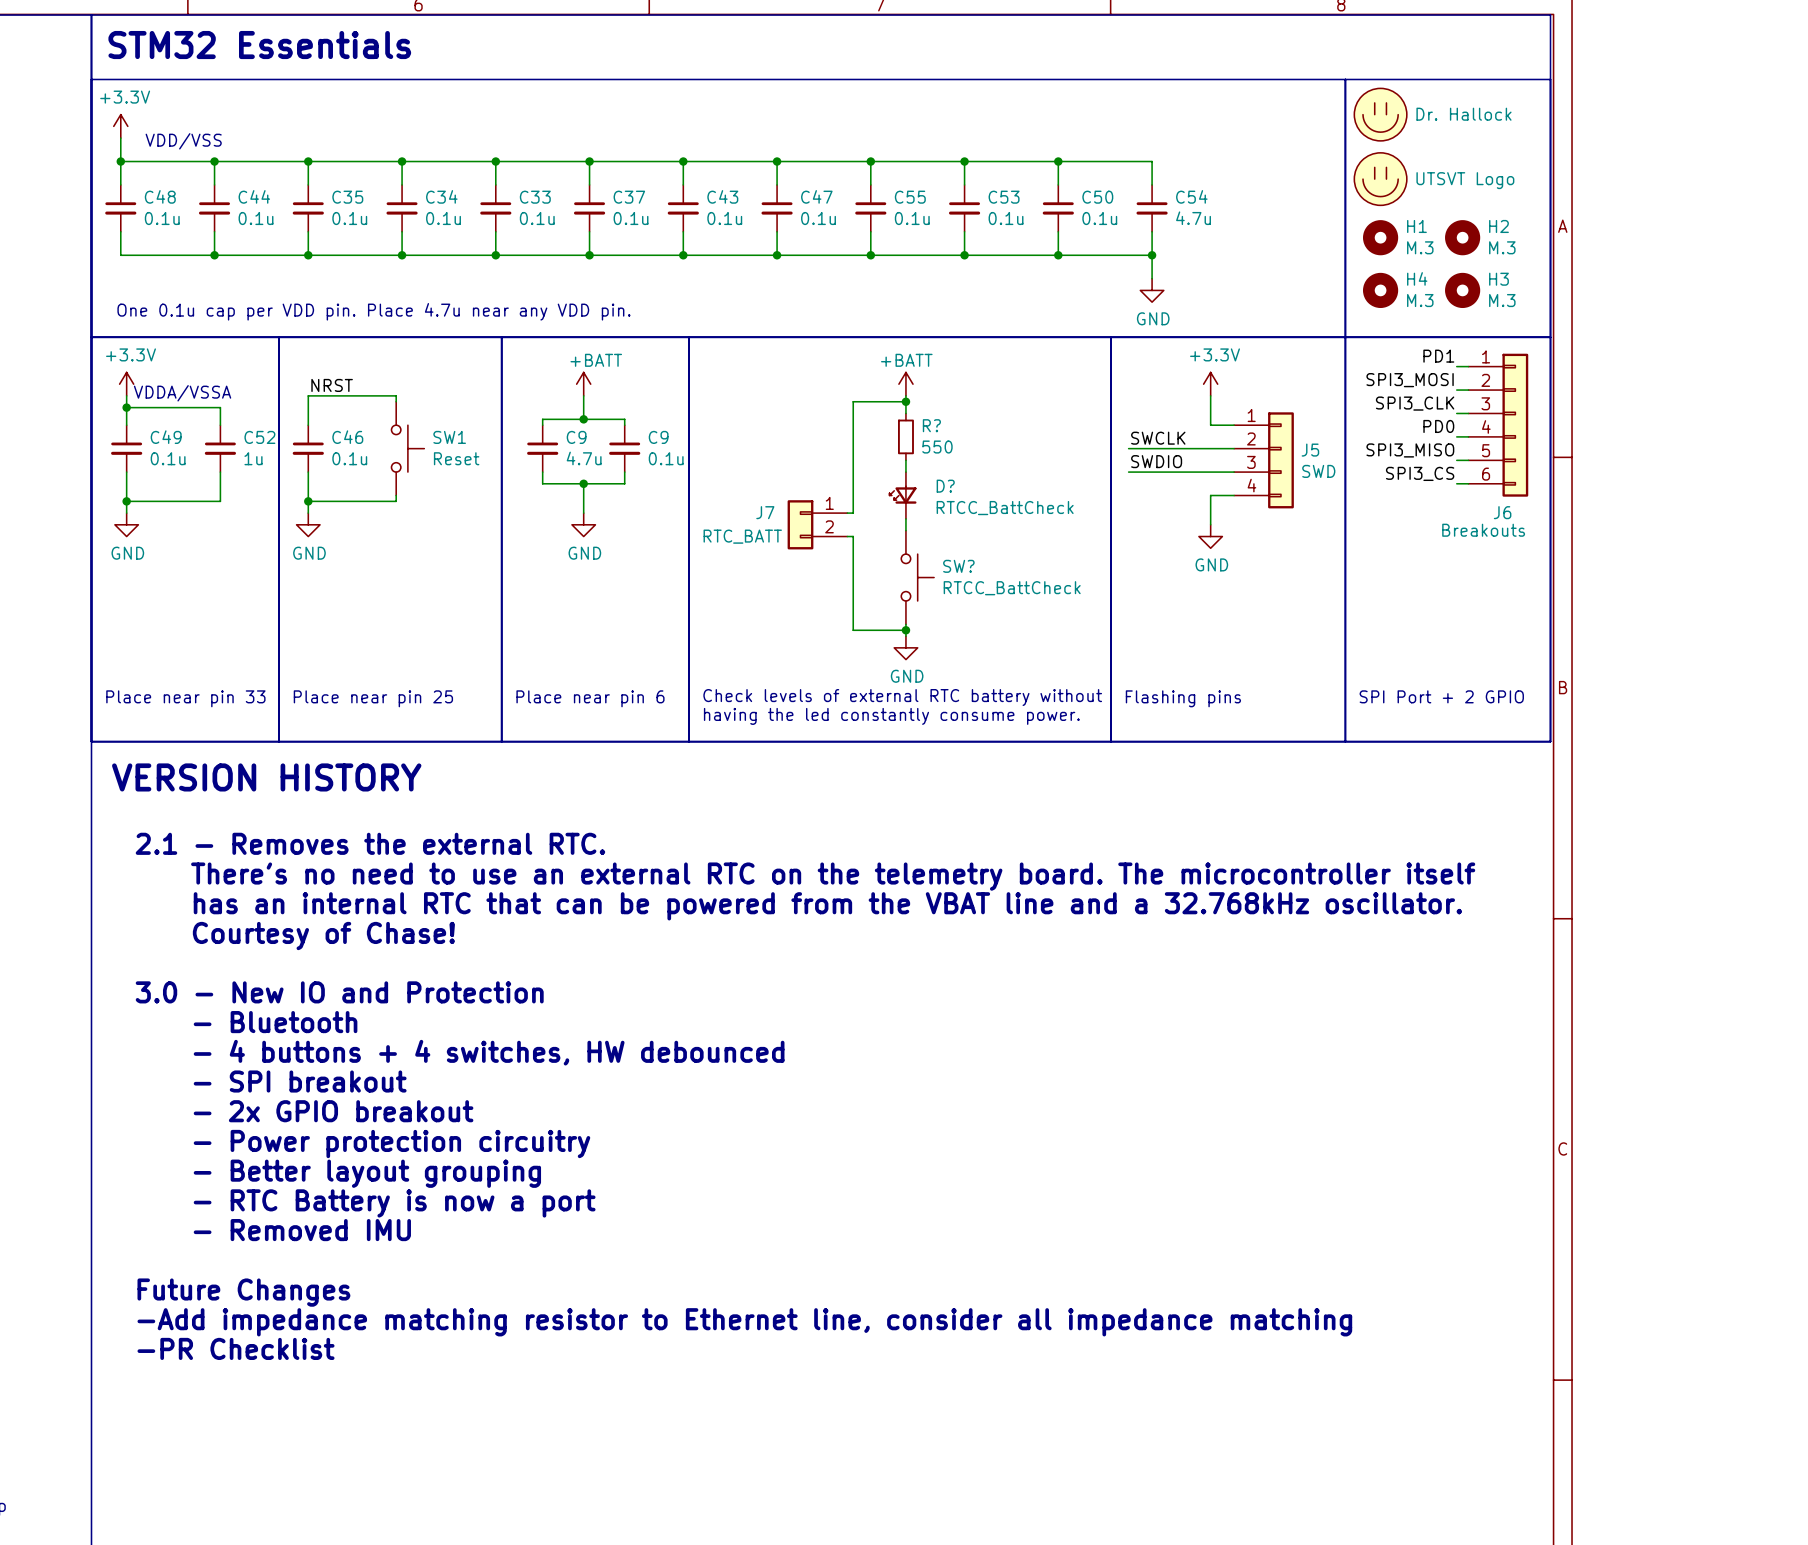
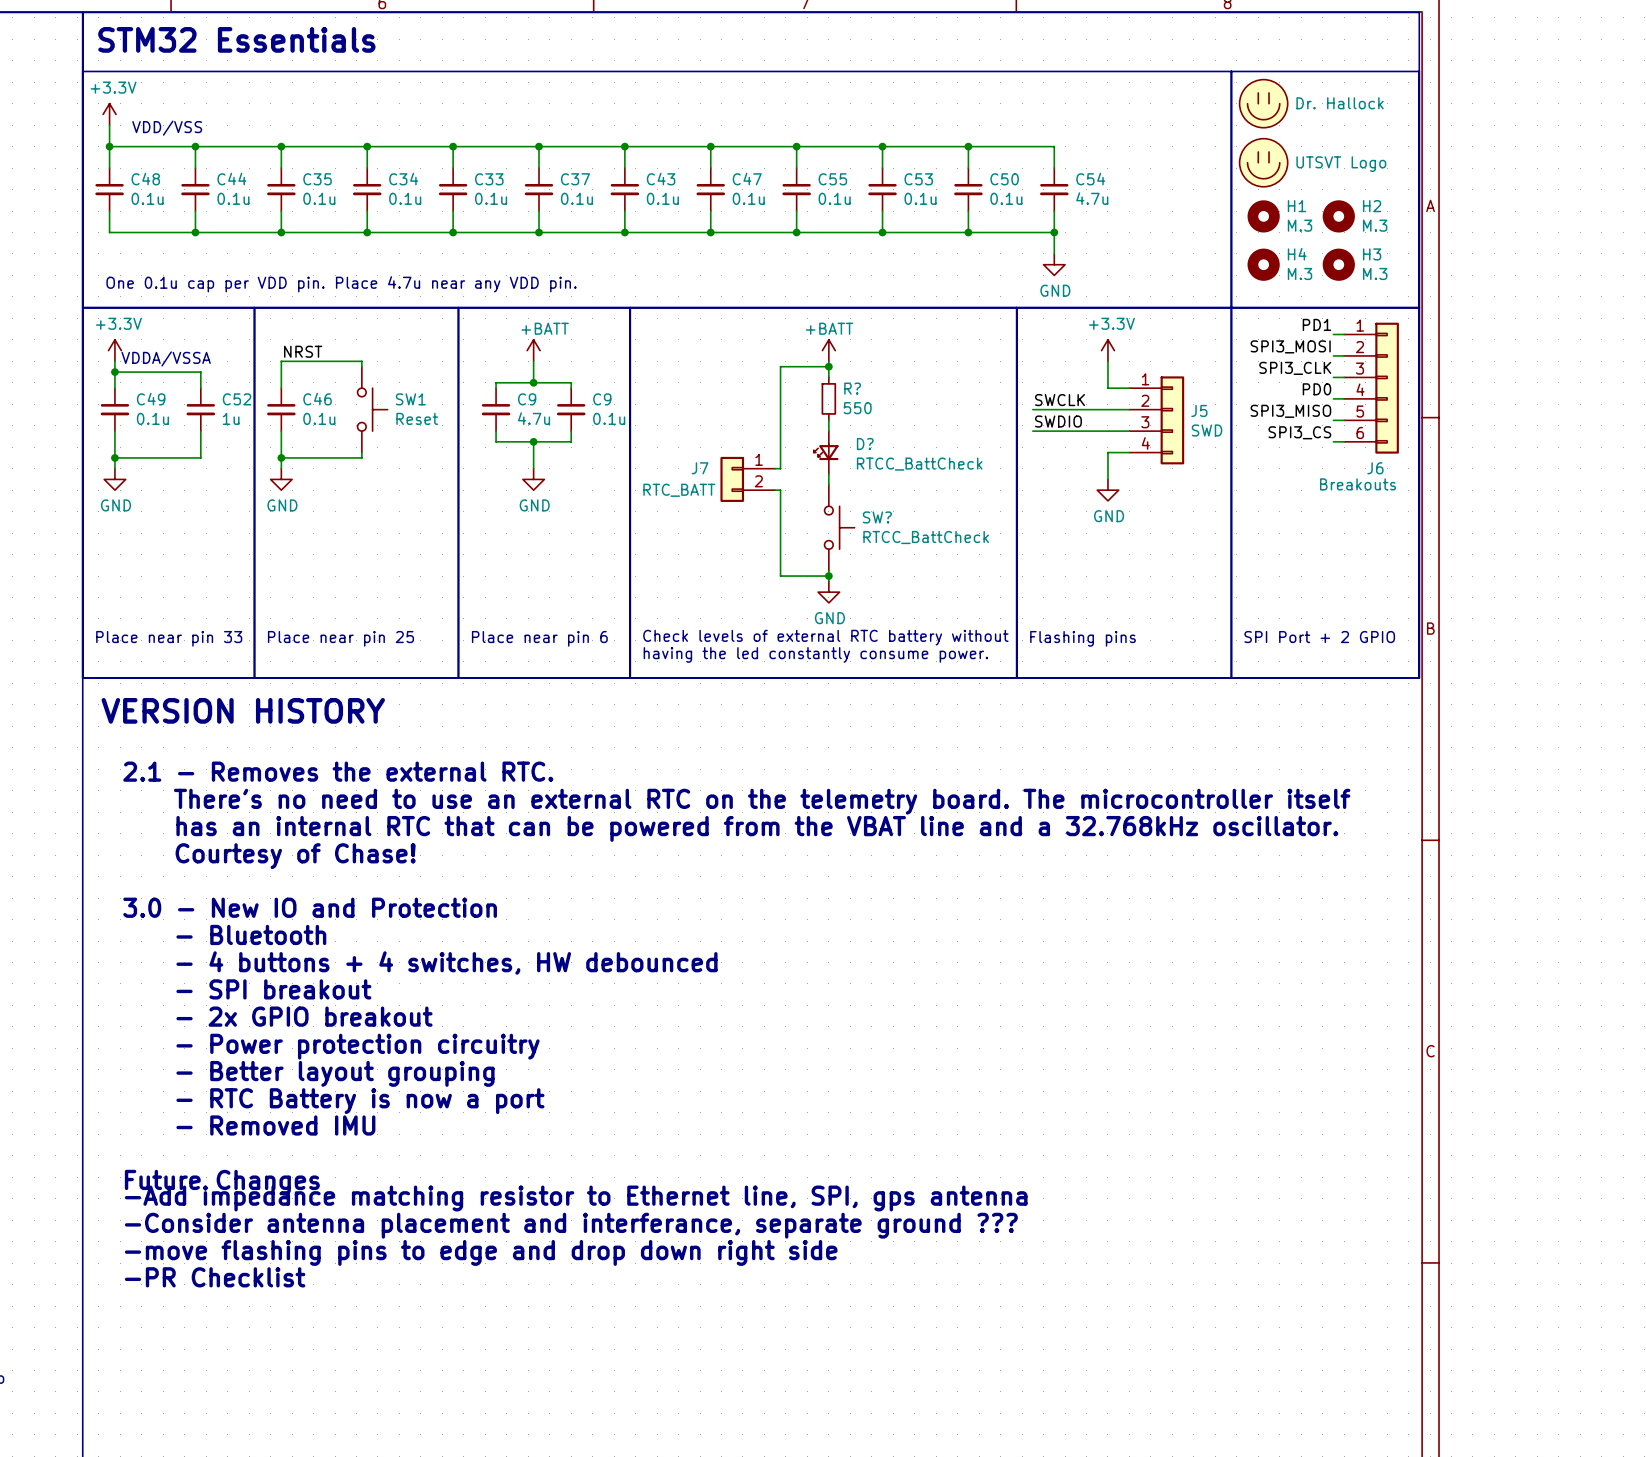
text: -Add impedance matching resistor to Ethernet line, consider all impedance matching (744, 1322) -> -Add impedance matching resistor to Ethernet line, SPI, gps antenna (576, 1198)
text: none -> -Consider antenna placement and interferance, separate ground ??? (571, 1225)
text position: -PR Checklist (236, 1348) -> -PR Checklist (215, 1277)
text: none -> -move flashing pins to edge and drop down right side (481, 1252)

